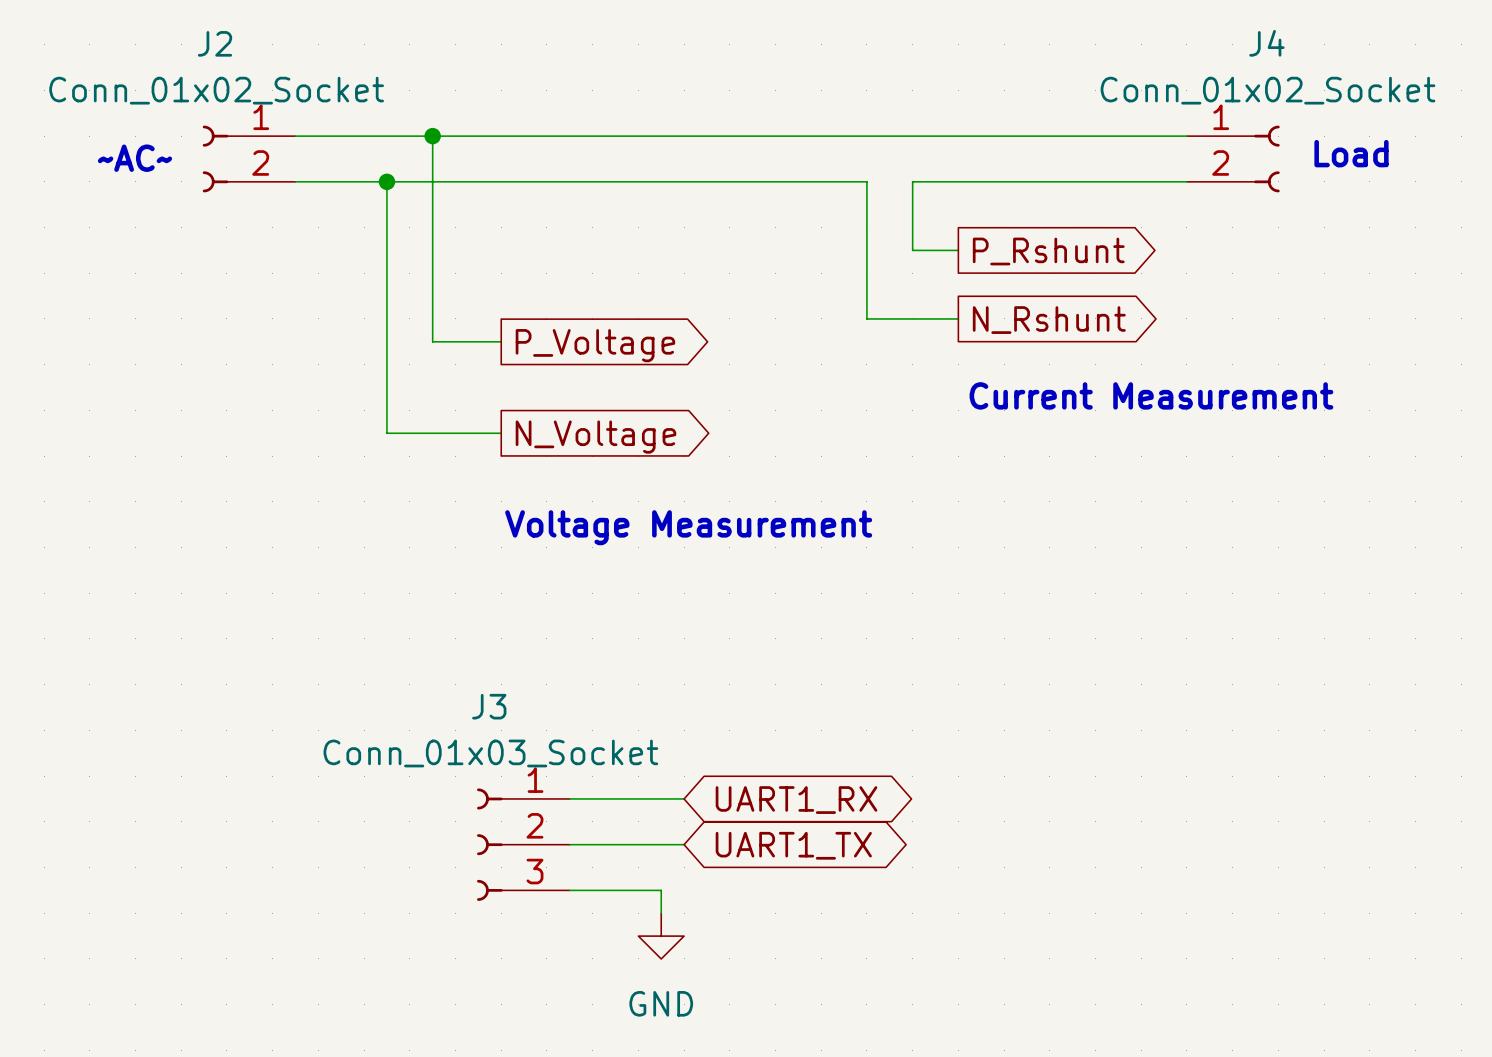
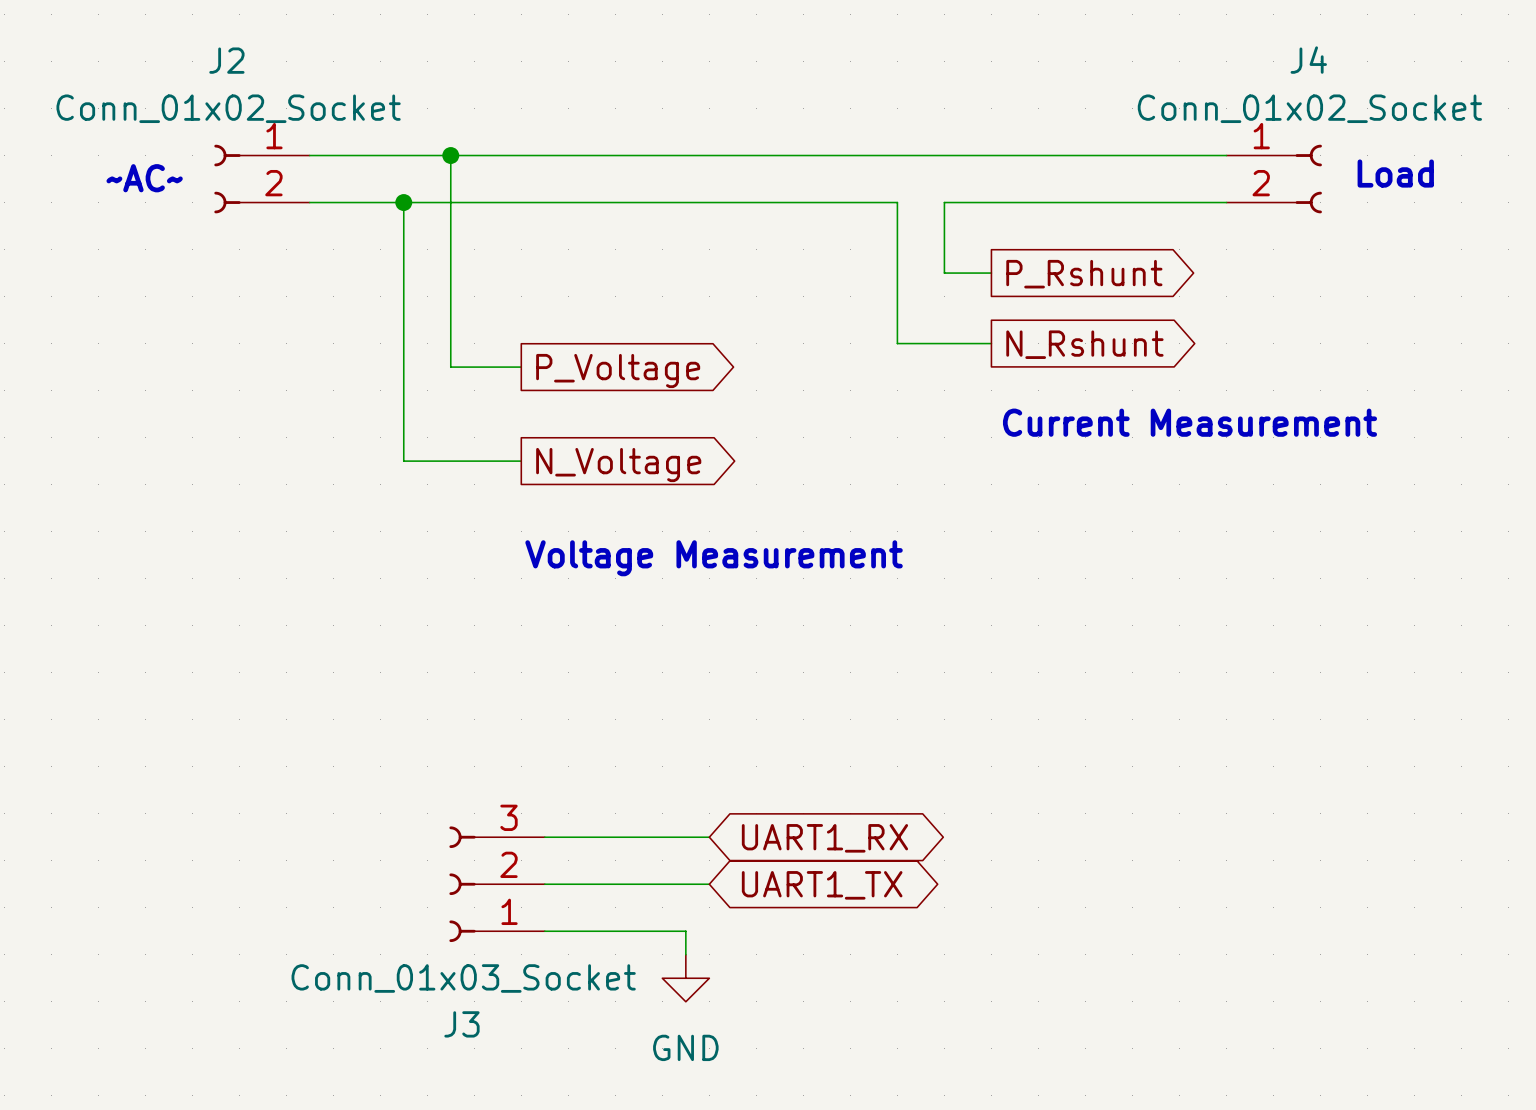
J3 flip: as is (489, 844) -> up-down (462, 884)

